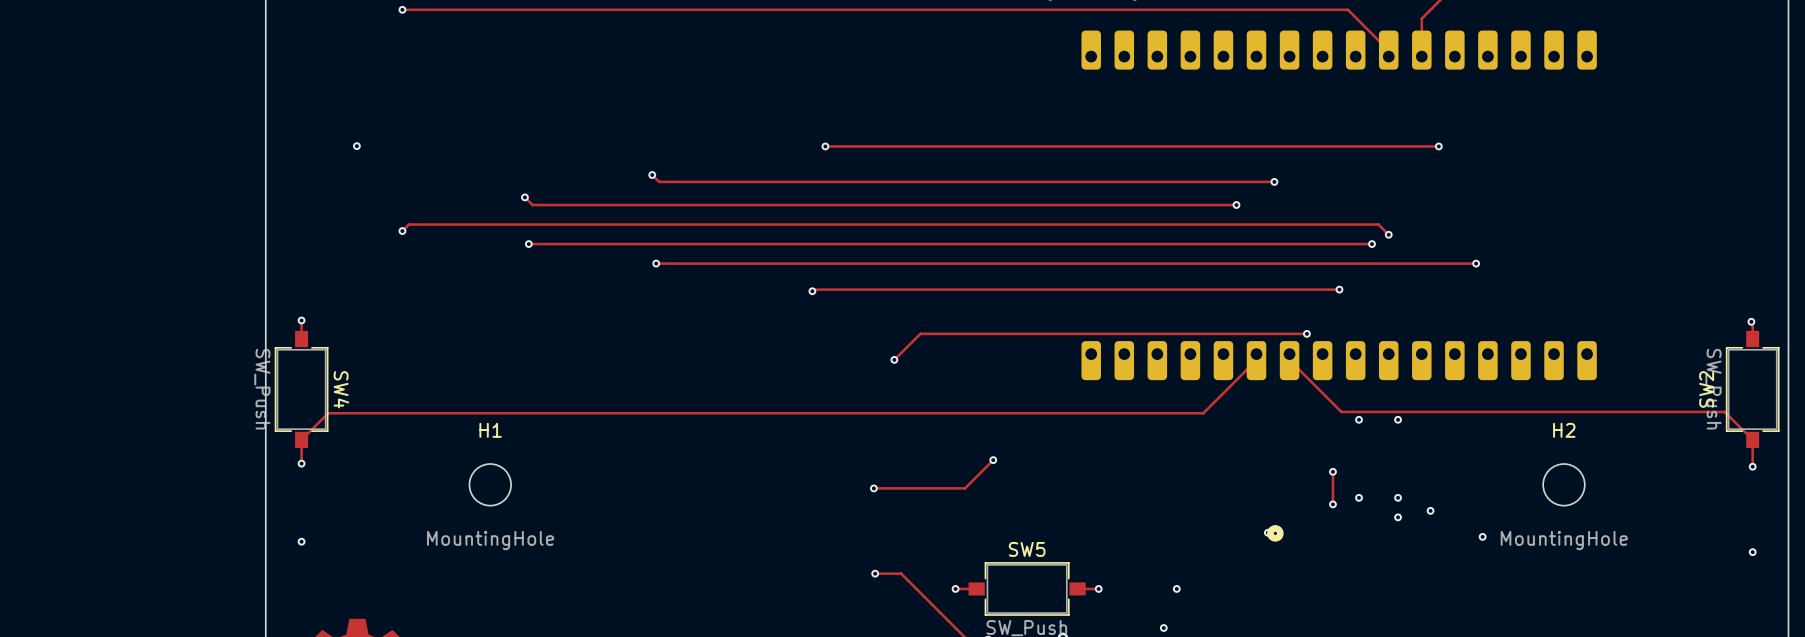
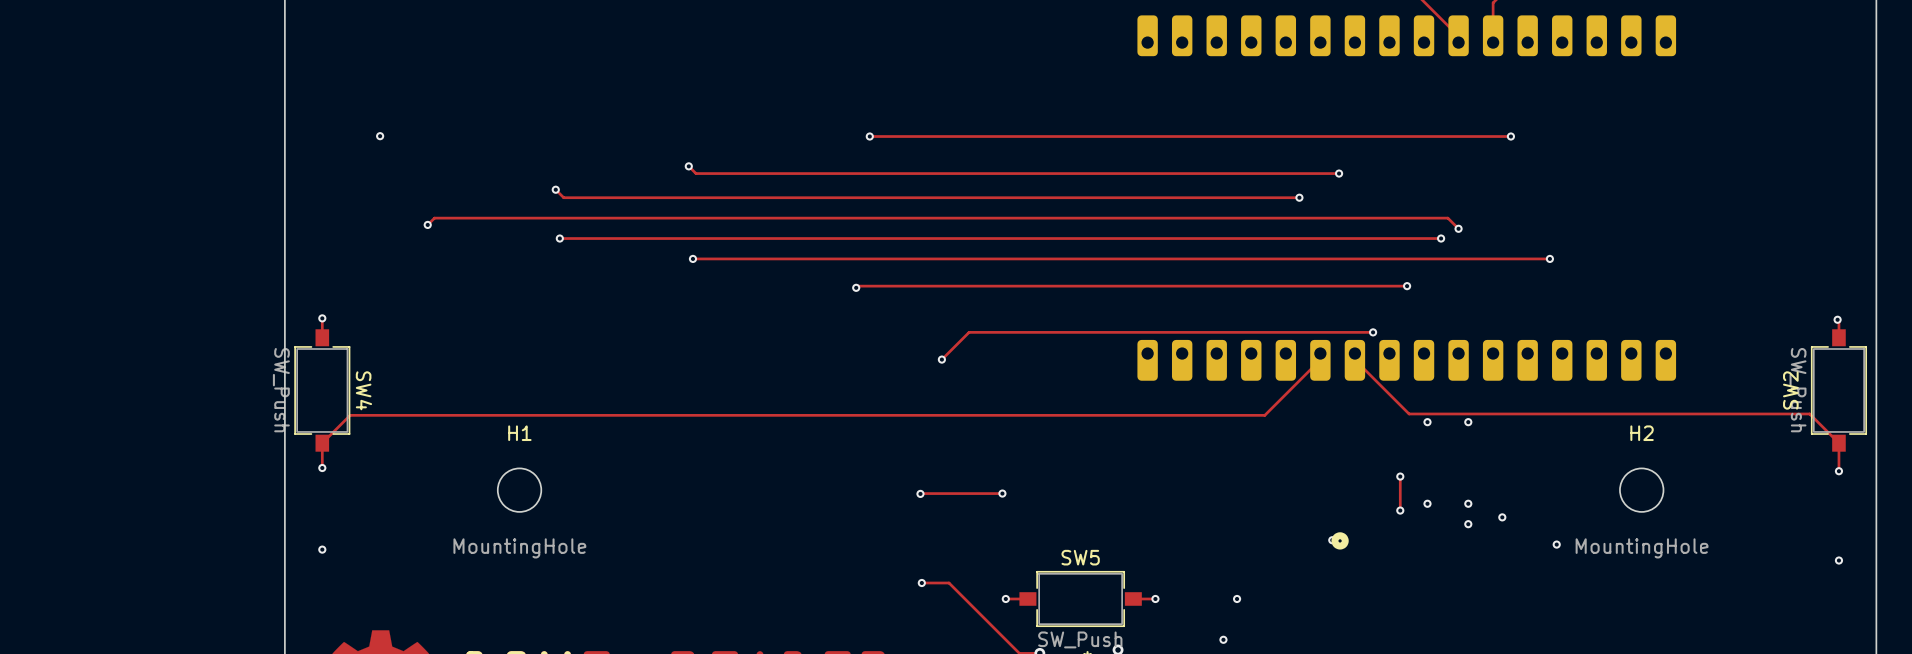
track: (993, 460) (964, 488) (873, 488) -> (1002, 493) (920, 493)
via position: (993, 460) -> (1002, 493)

